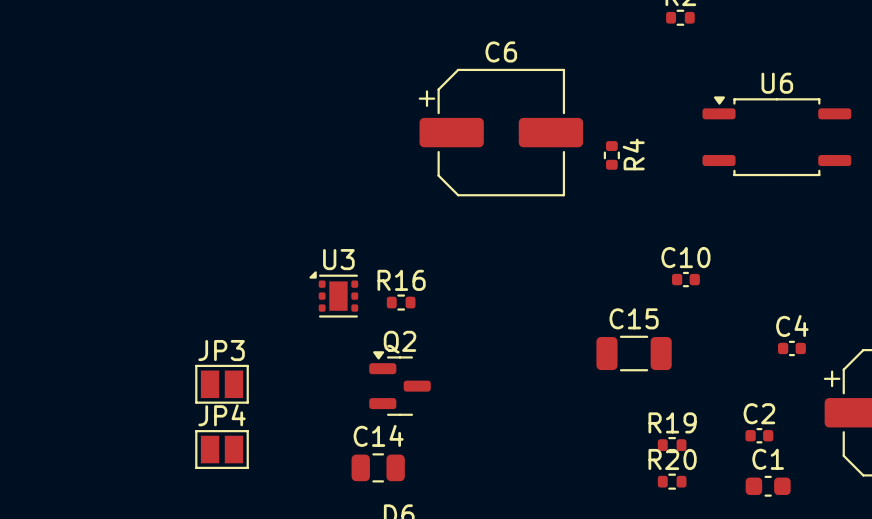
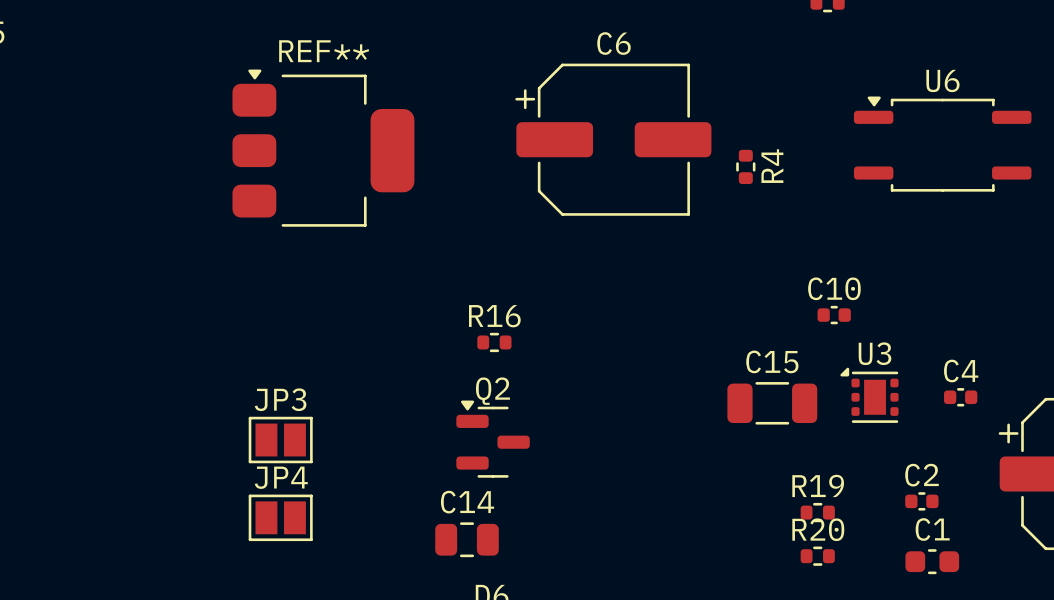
REF**: none -> (323, 148)
U3 position: (333, 294) -> (869, 395)

